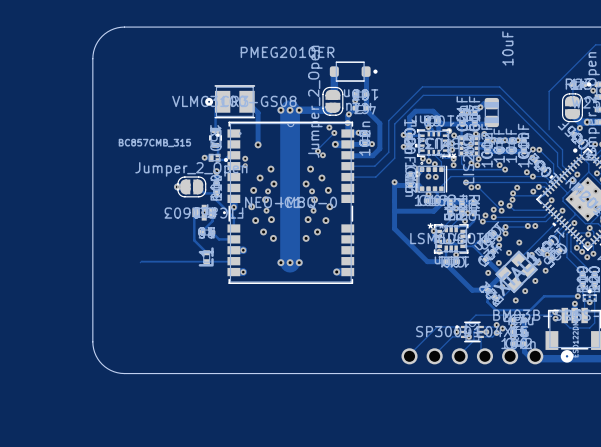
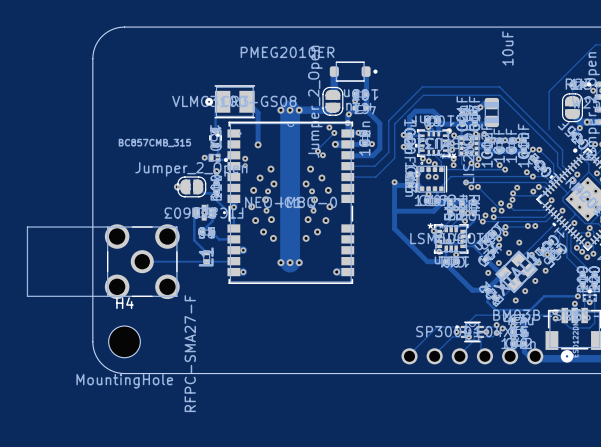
part: none -> RFPC-SMA27-F (103, 261)
H4: none -> MountingHole (124, 341)

